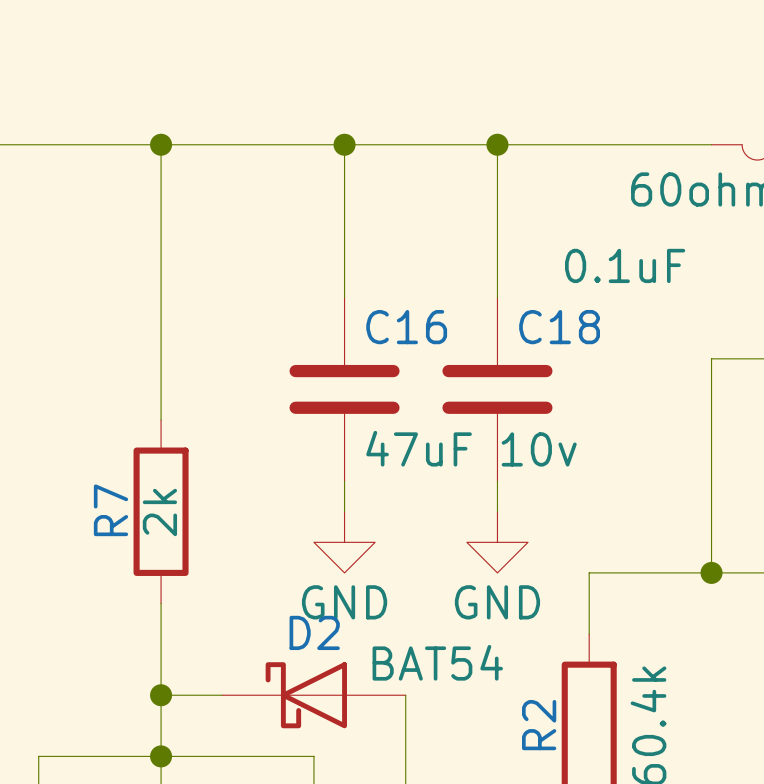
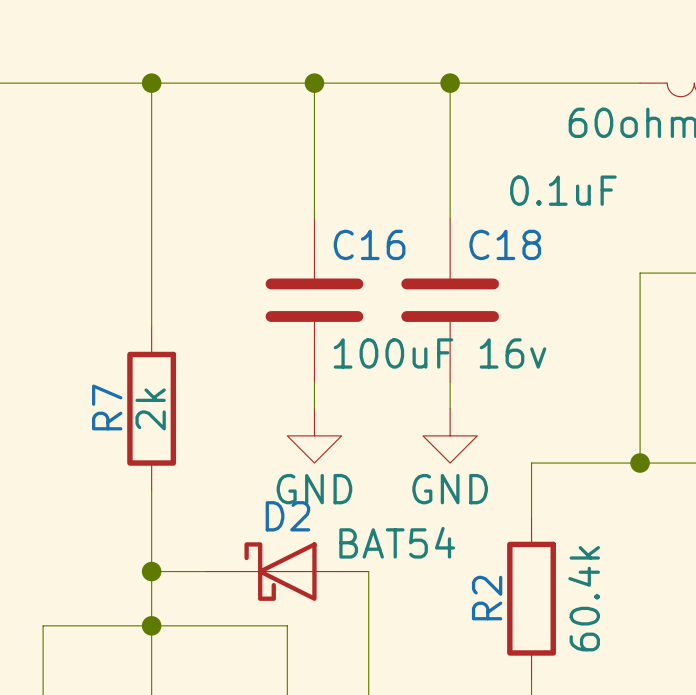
C16 value: 47uF 10v (471, 448) -> 100uF 16v (440, 353)

